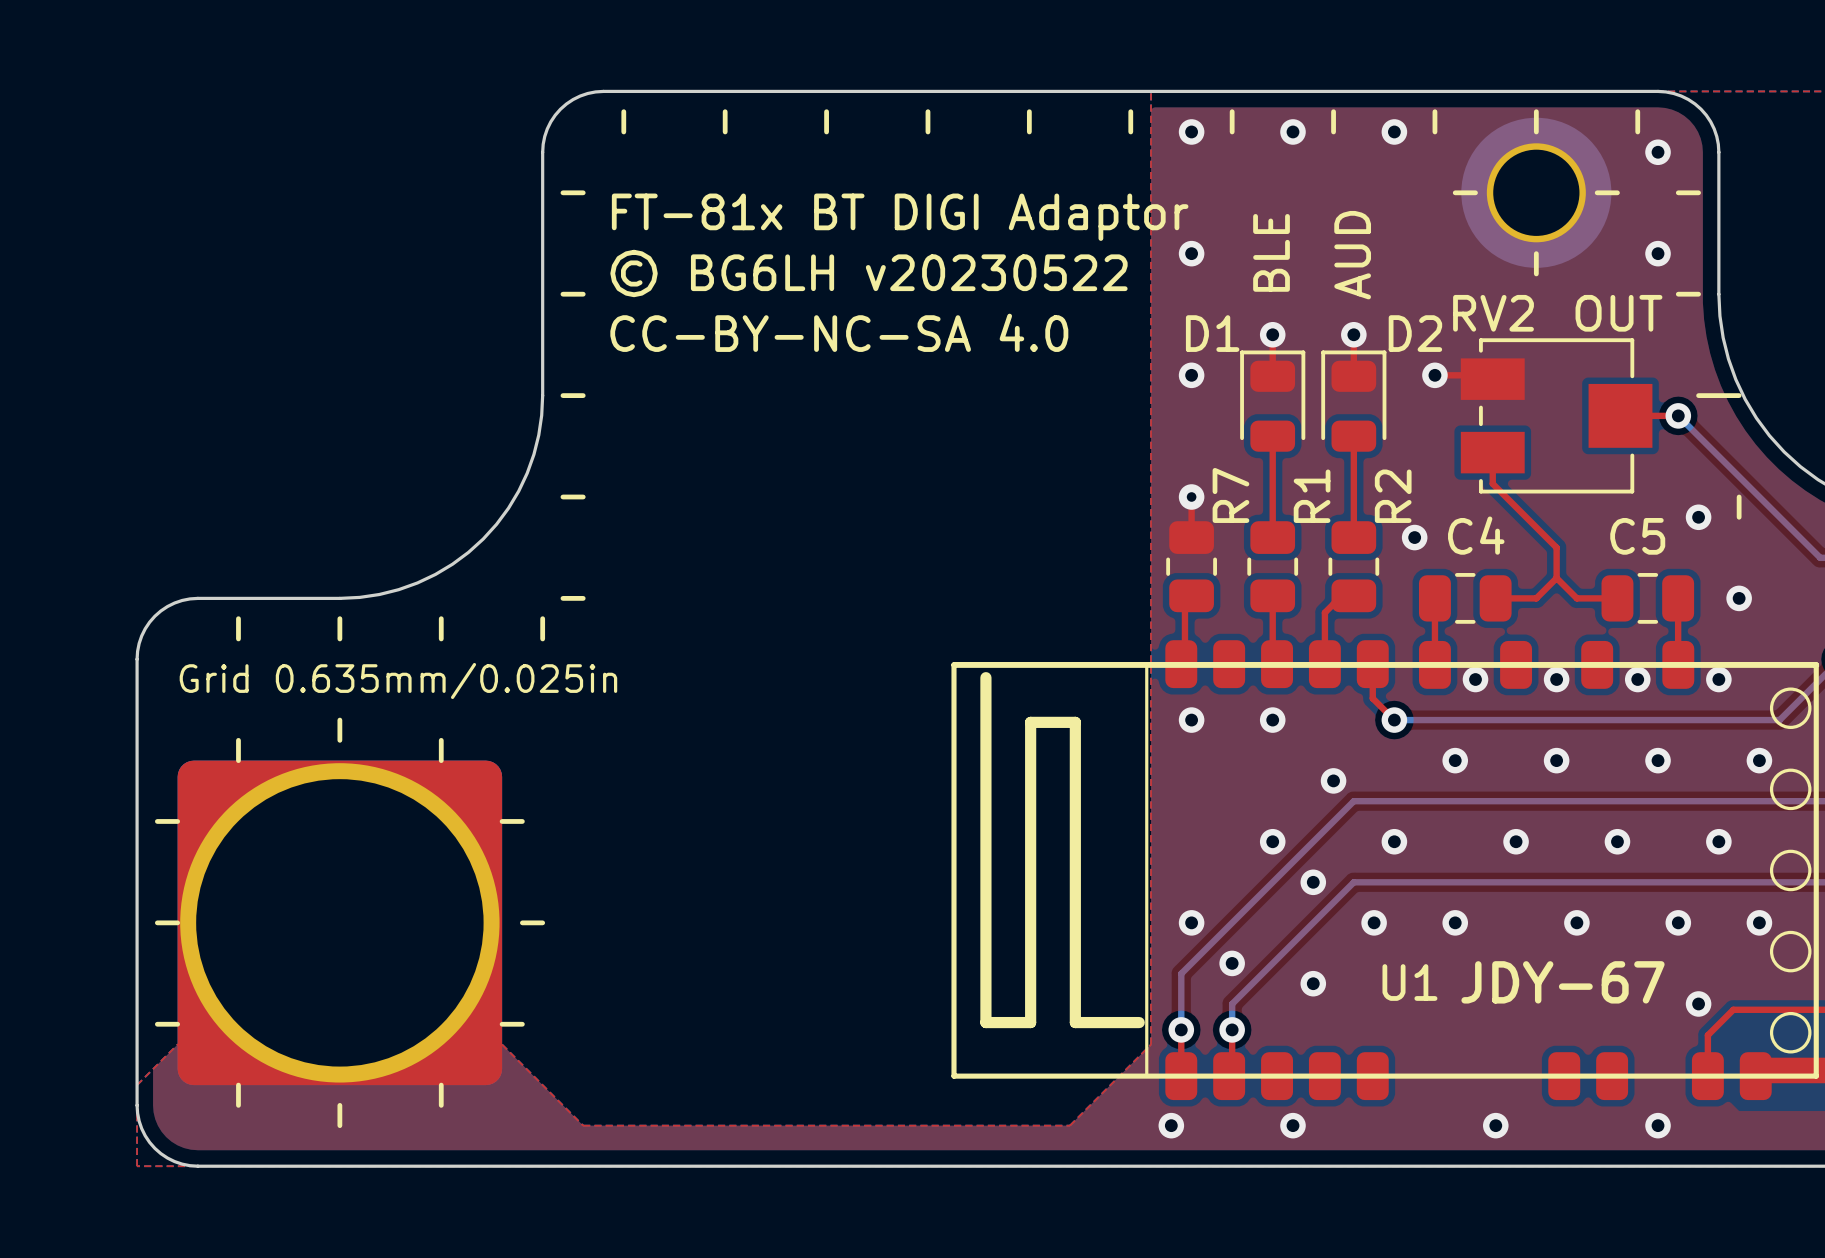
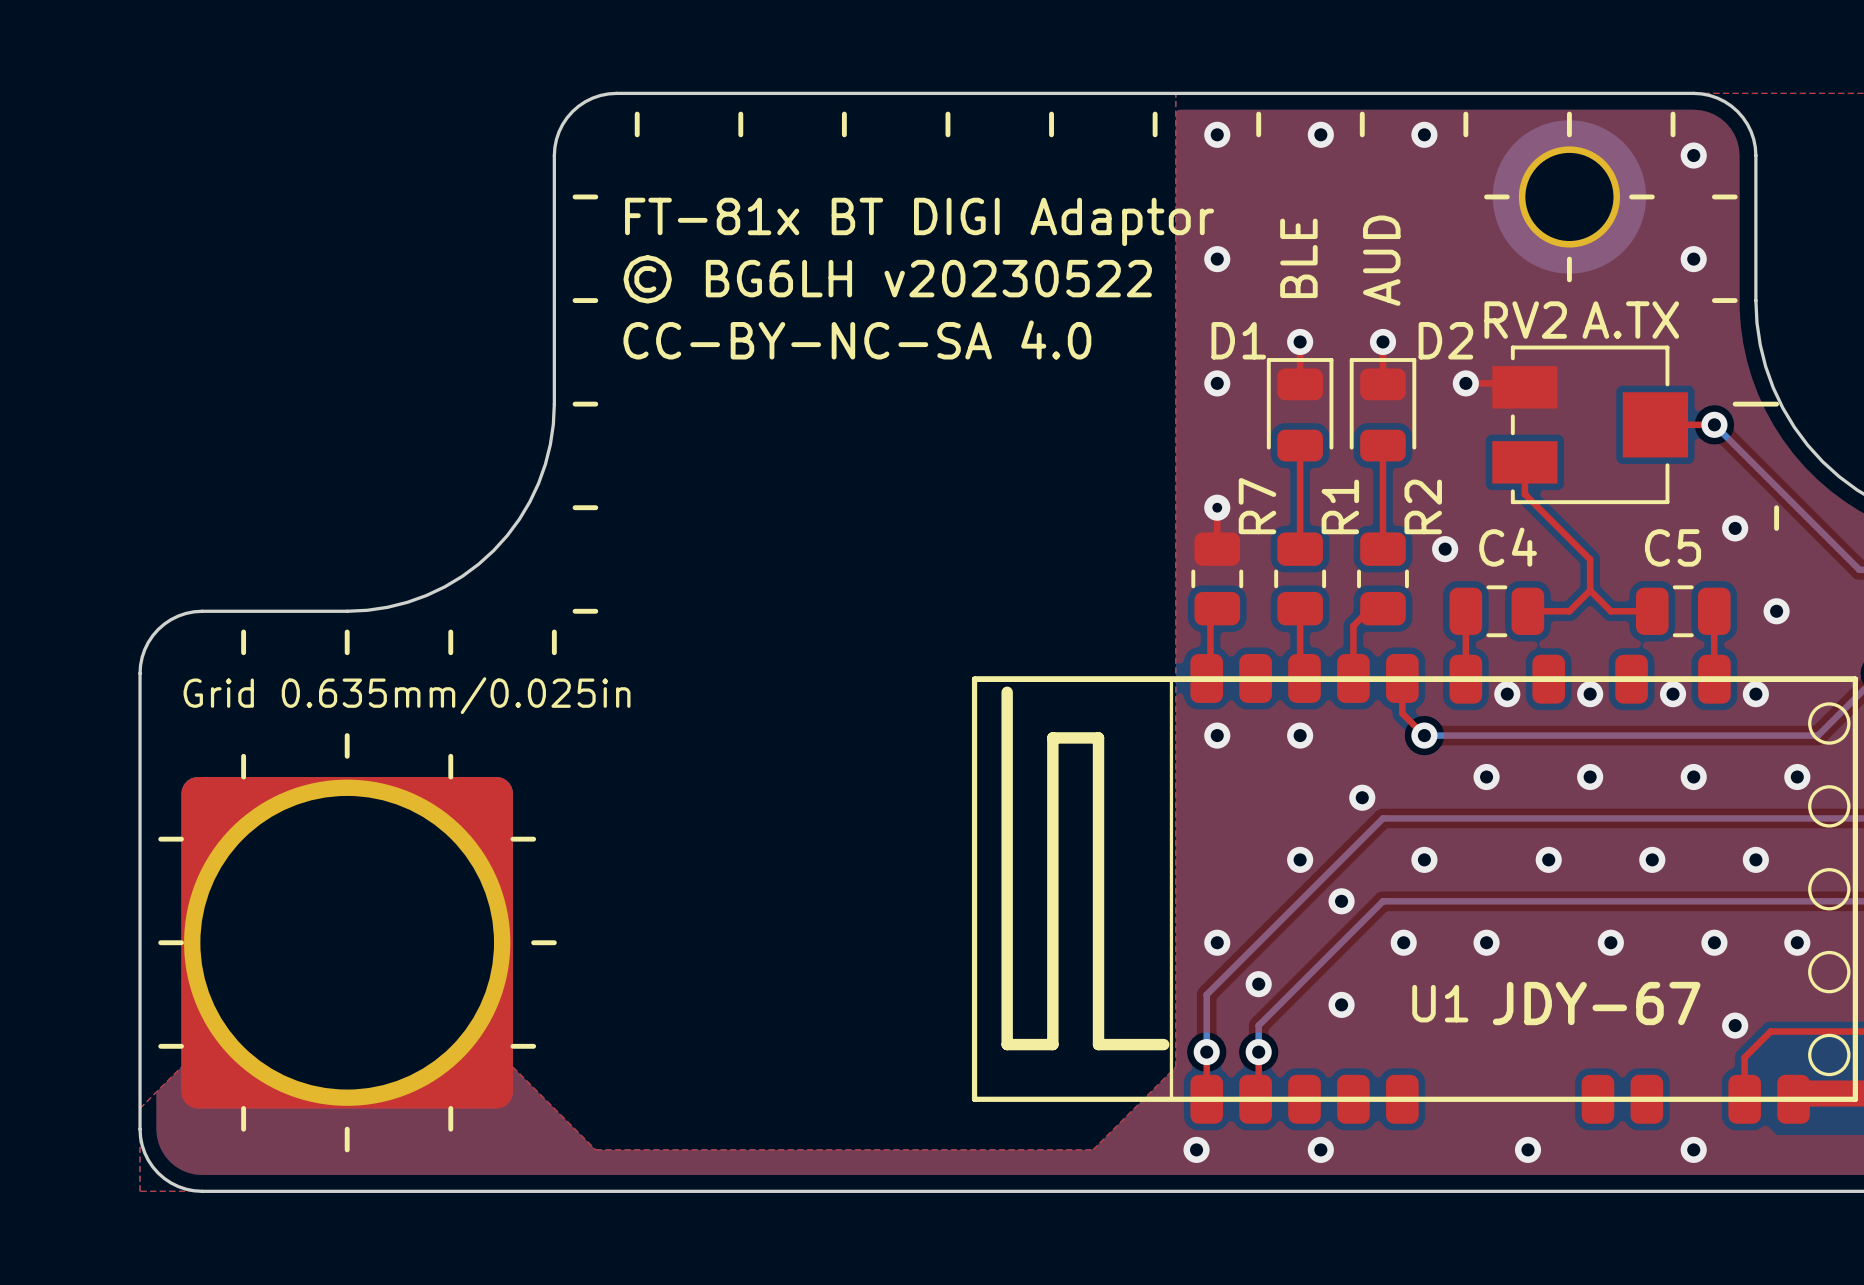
text: OUT (1618, 313) -> A.TX (1630, 320)

